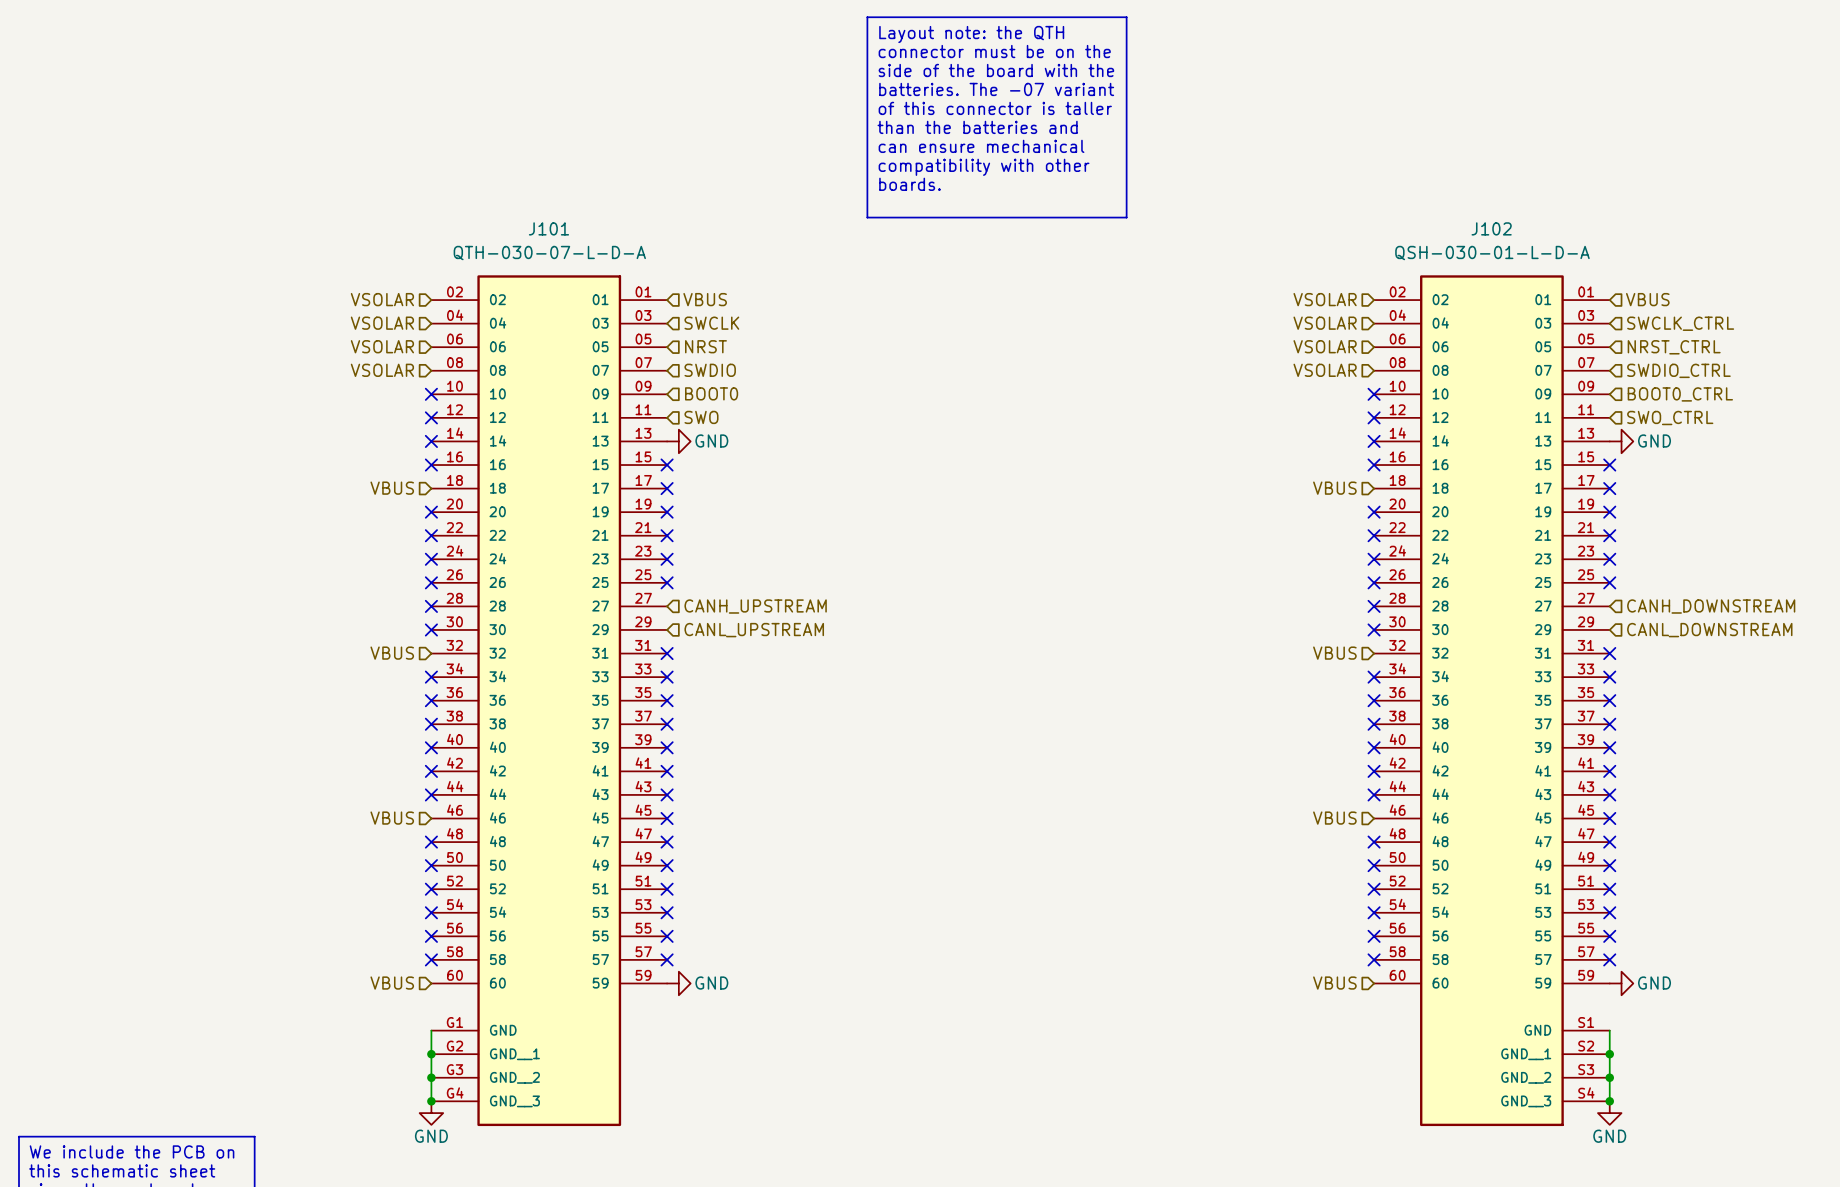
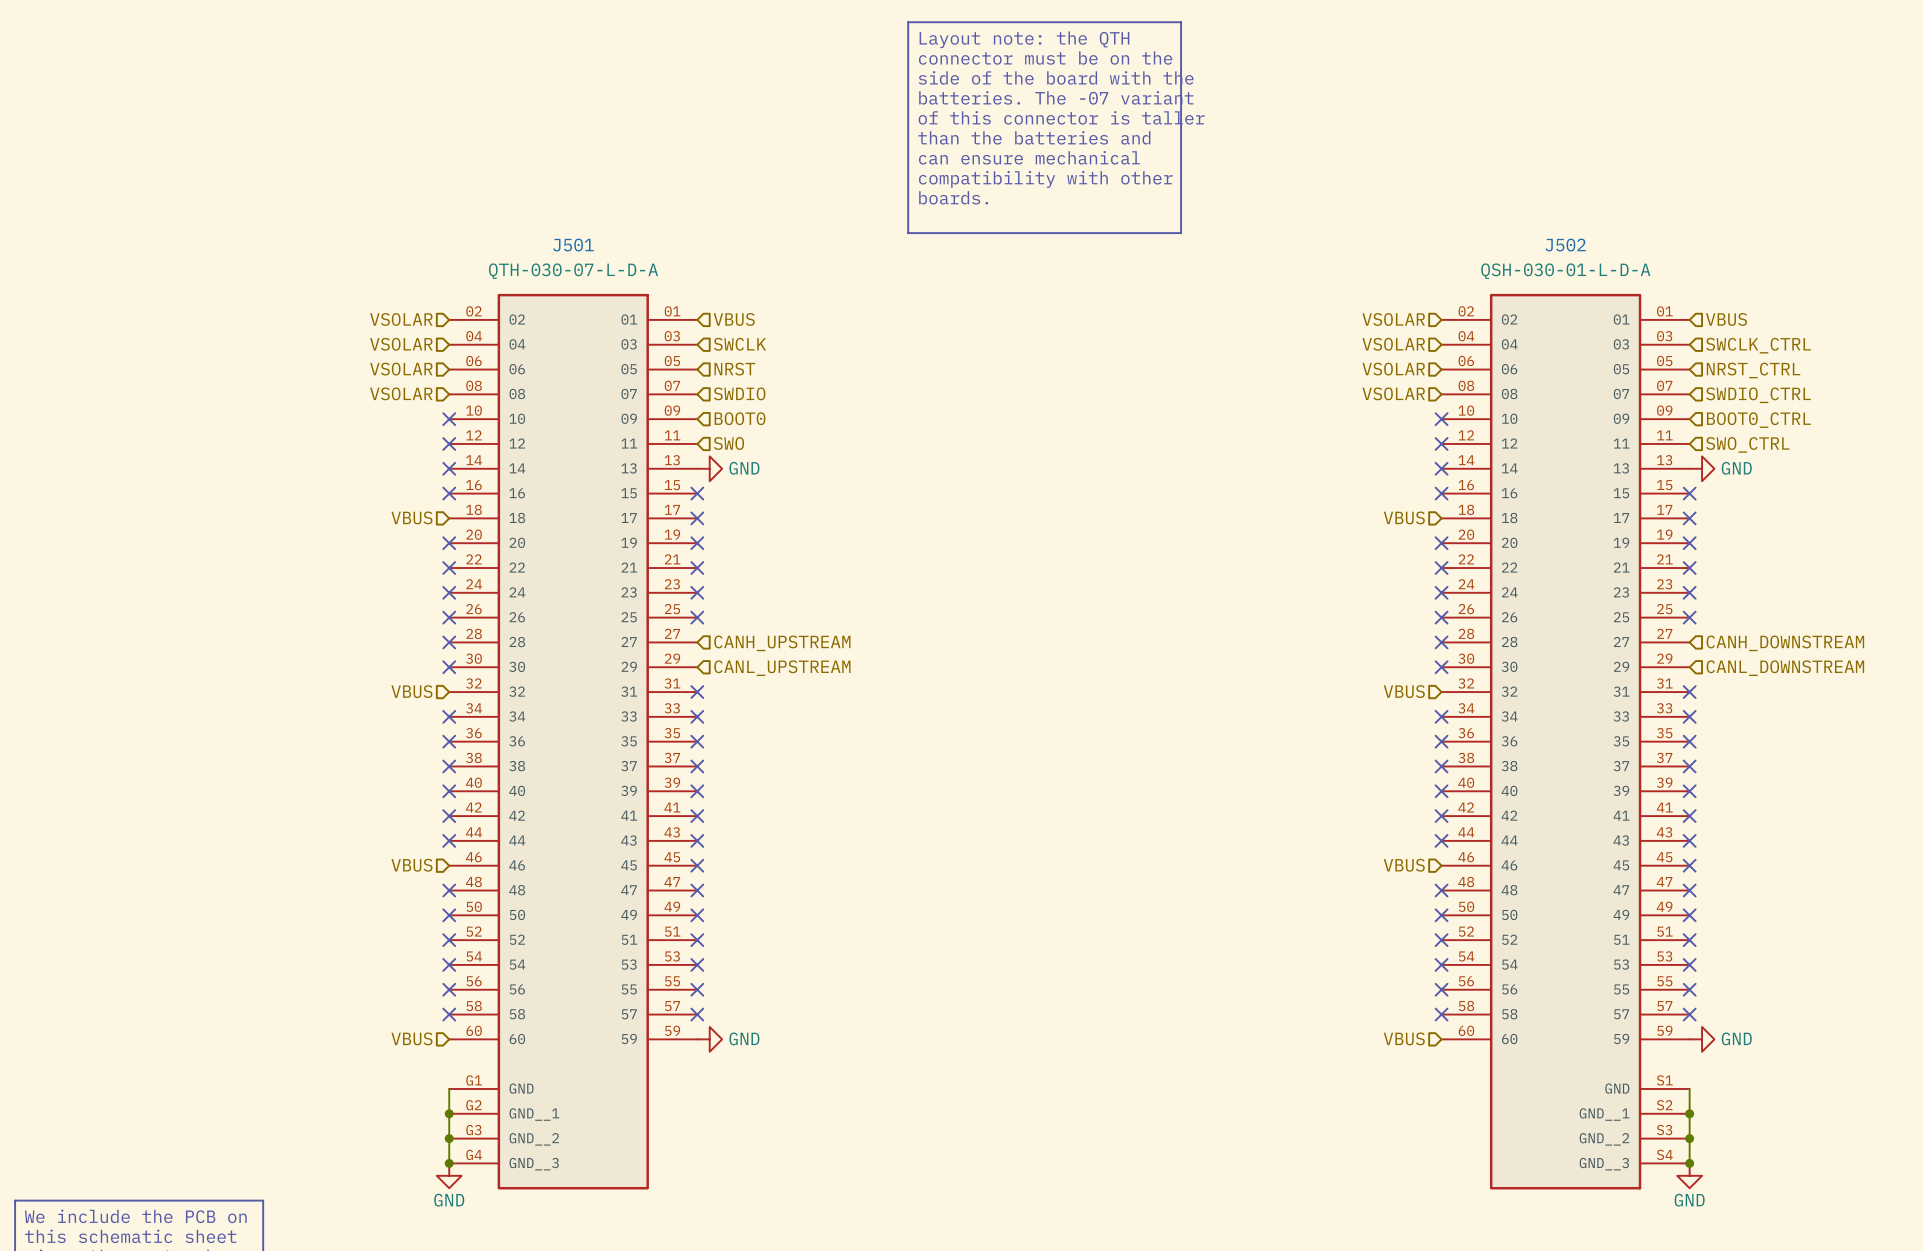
J101 name: J101 (548, 228) -> J501 (573, 245)
J102 name: J102 (1491, 228) -> J502 (1565, 245)

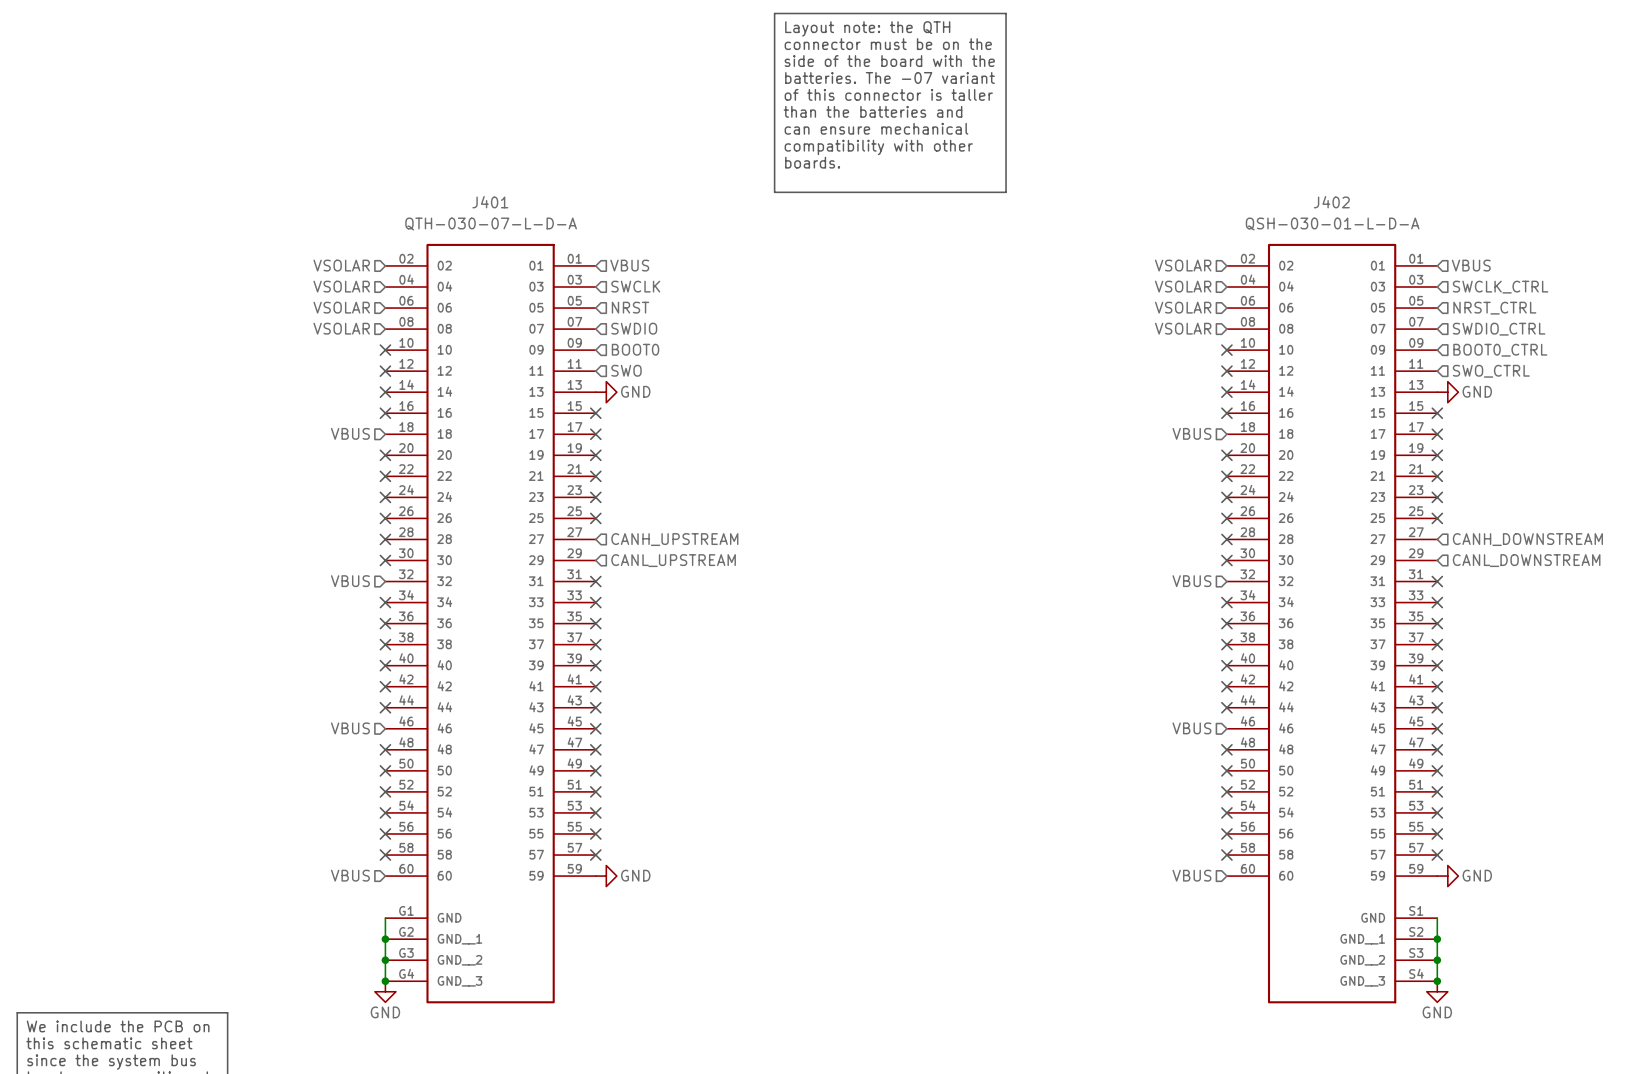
J501 name: J501 (573, 245) -> J401 (490, 202)
J502 name: J502 (1565, 245) -> J402 (1331, 202)

